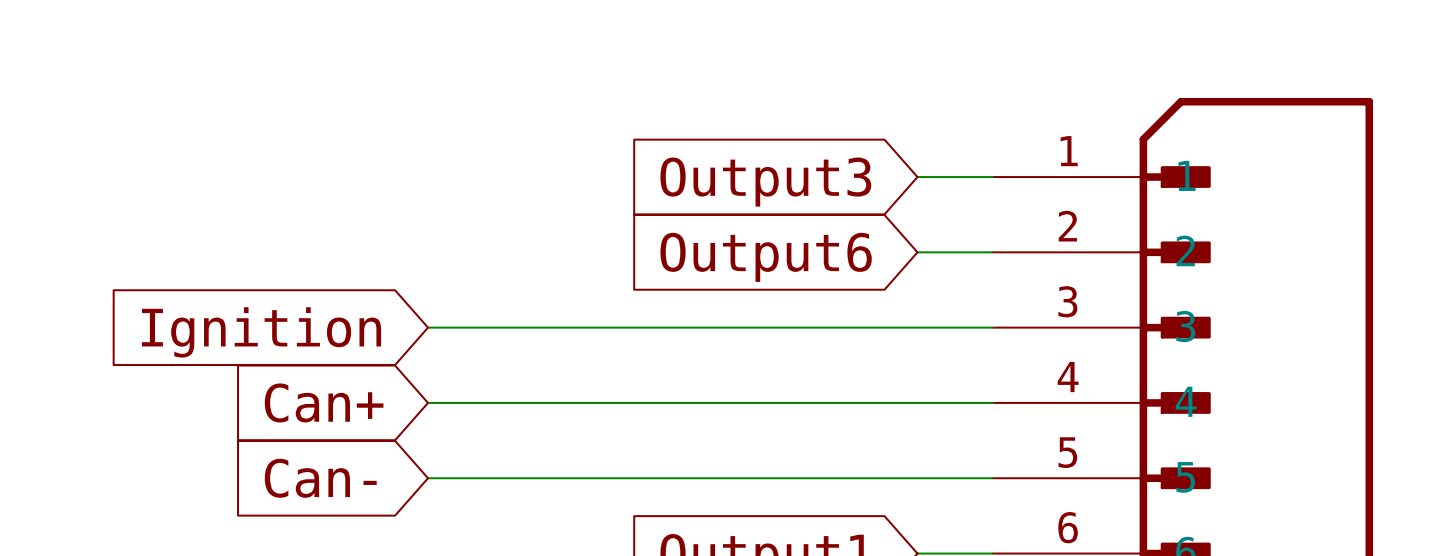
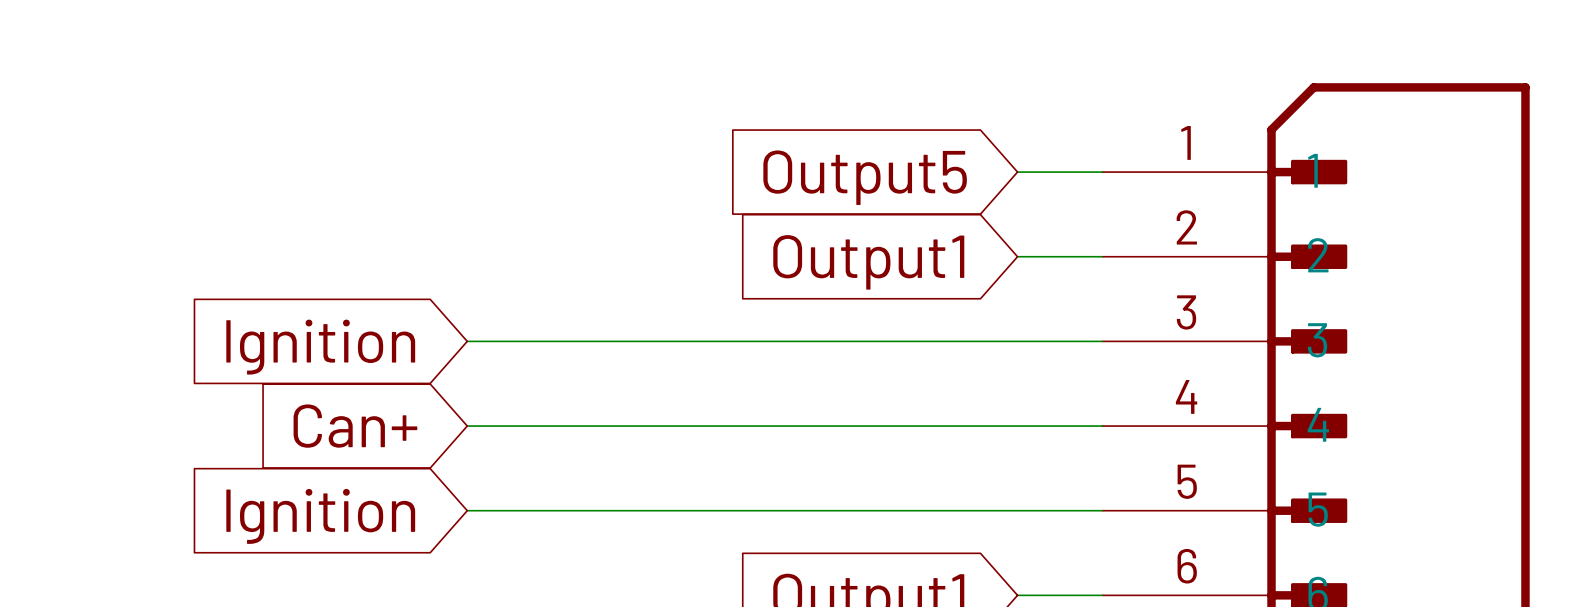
global label: Output3 (765, 182) -> Output5 (865, 177)
global label: Output6 (766, 257) -> Output1 (868, 262)
global label: Can- (320, 478) -> Ignition (320, 516)

